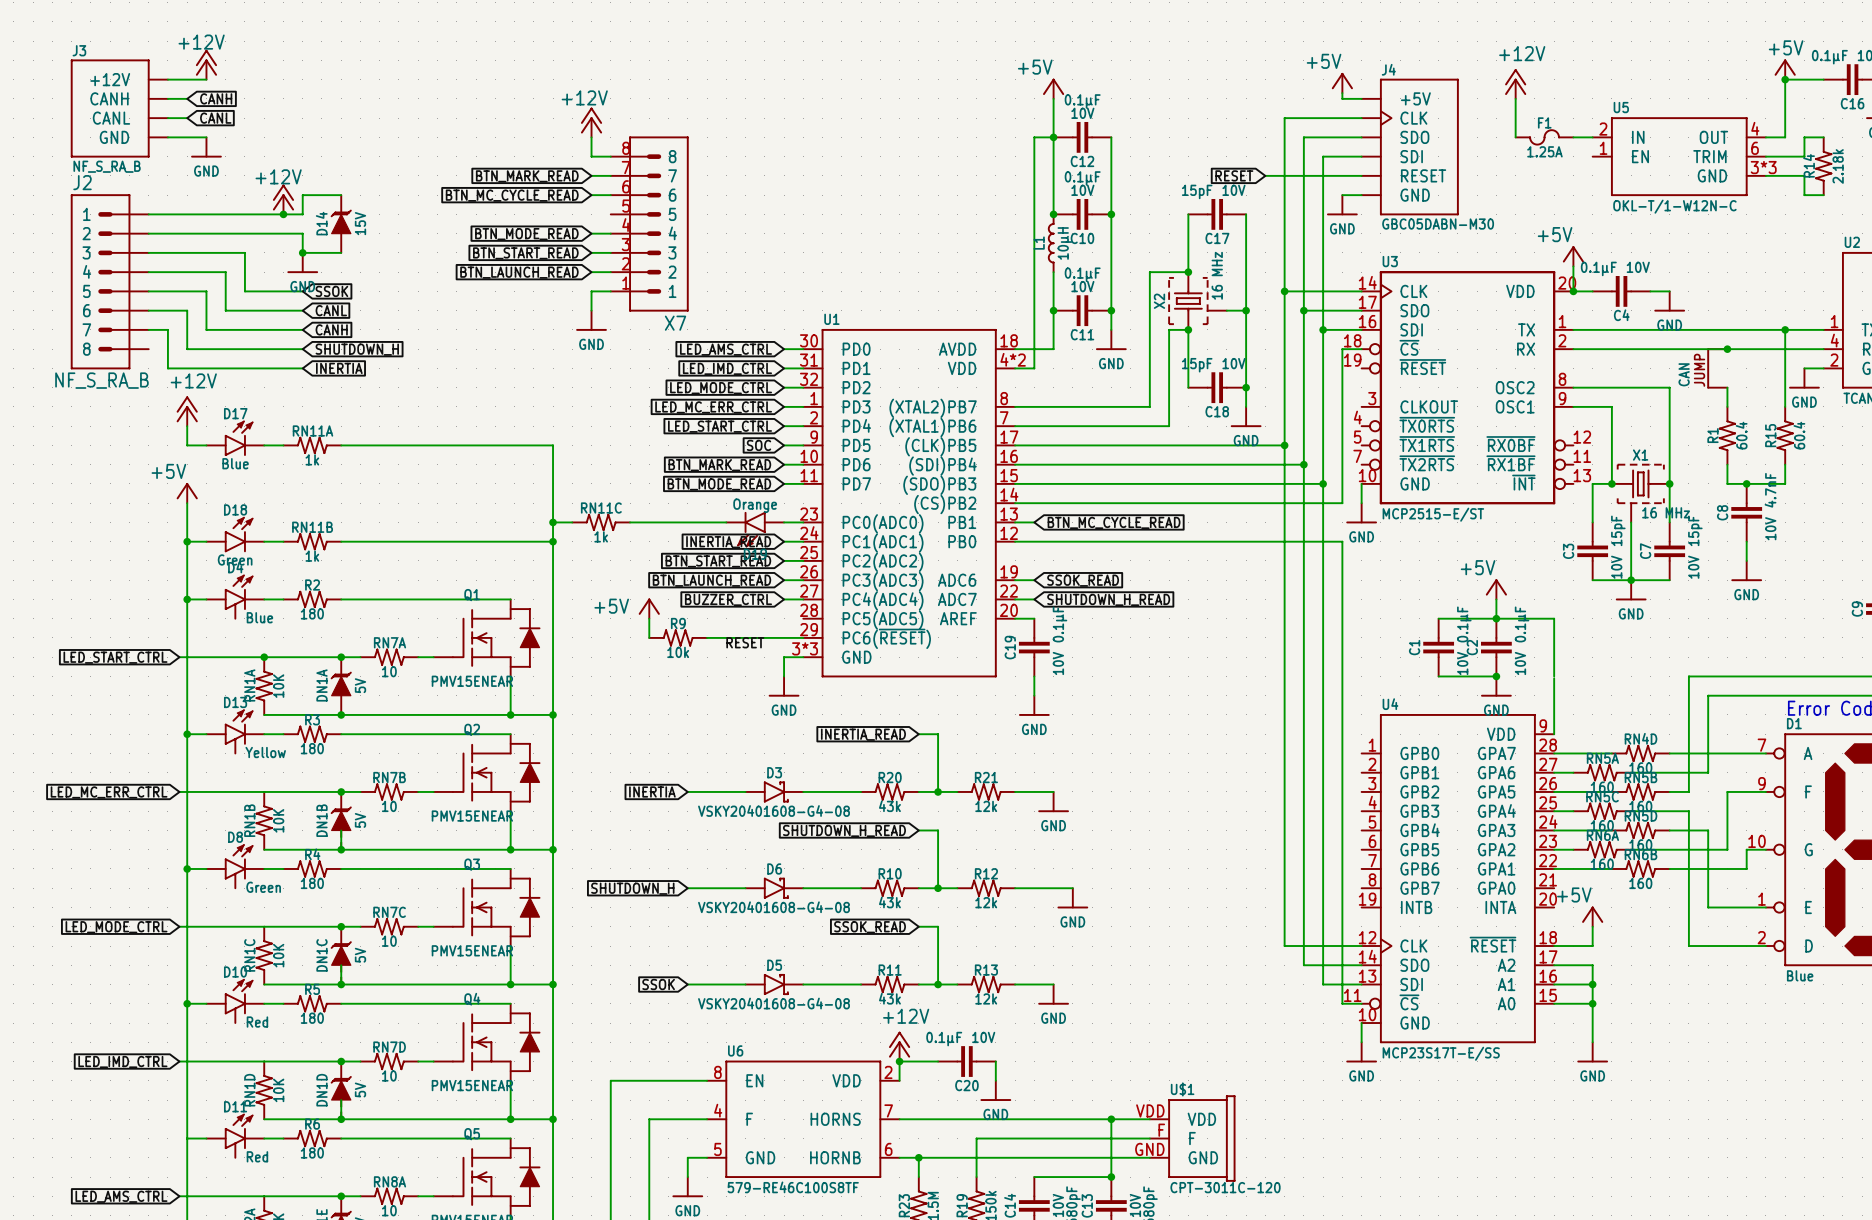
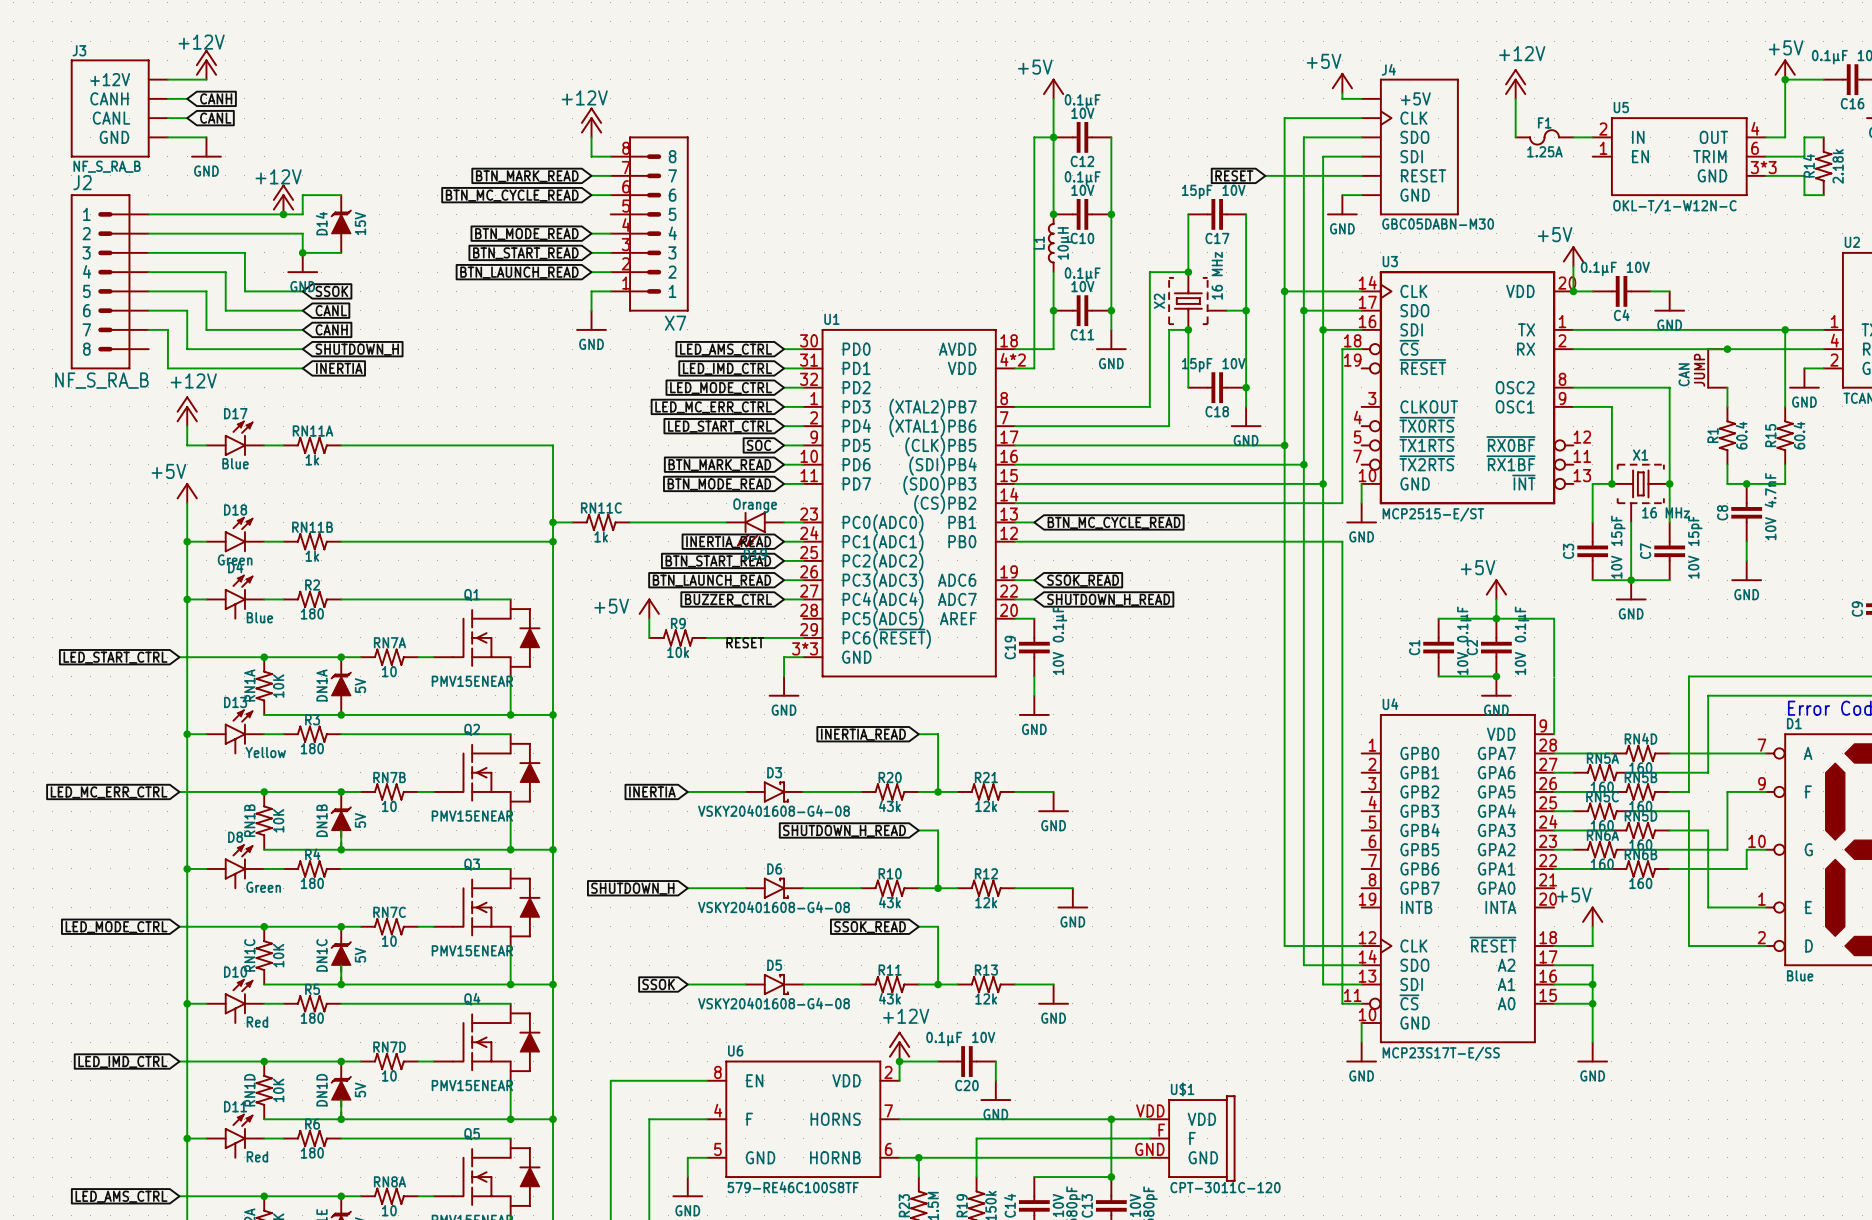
junction: none -> (264, 791)
junction: none -> (264, 926)
junction: none -> (264, 1061)
junction: none -> (187, 1138)
junction: none -> (264, 1196)

